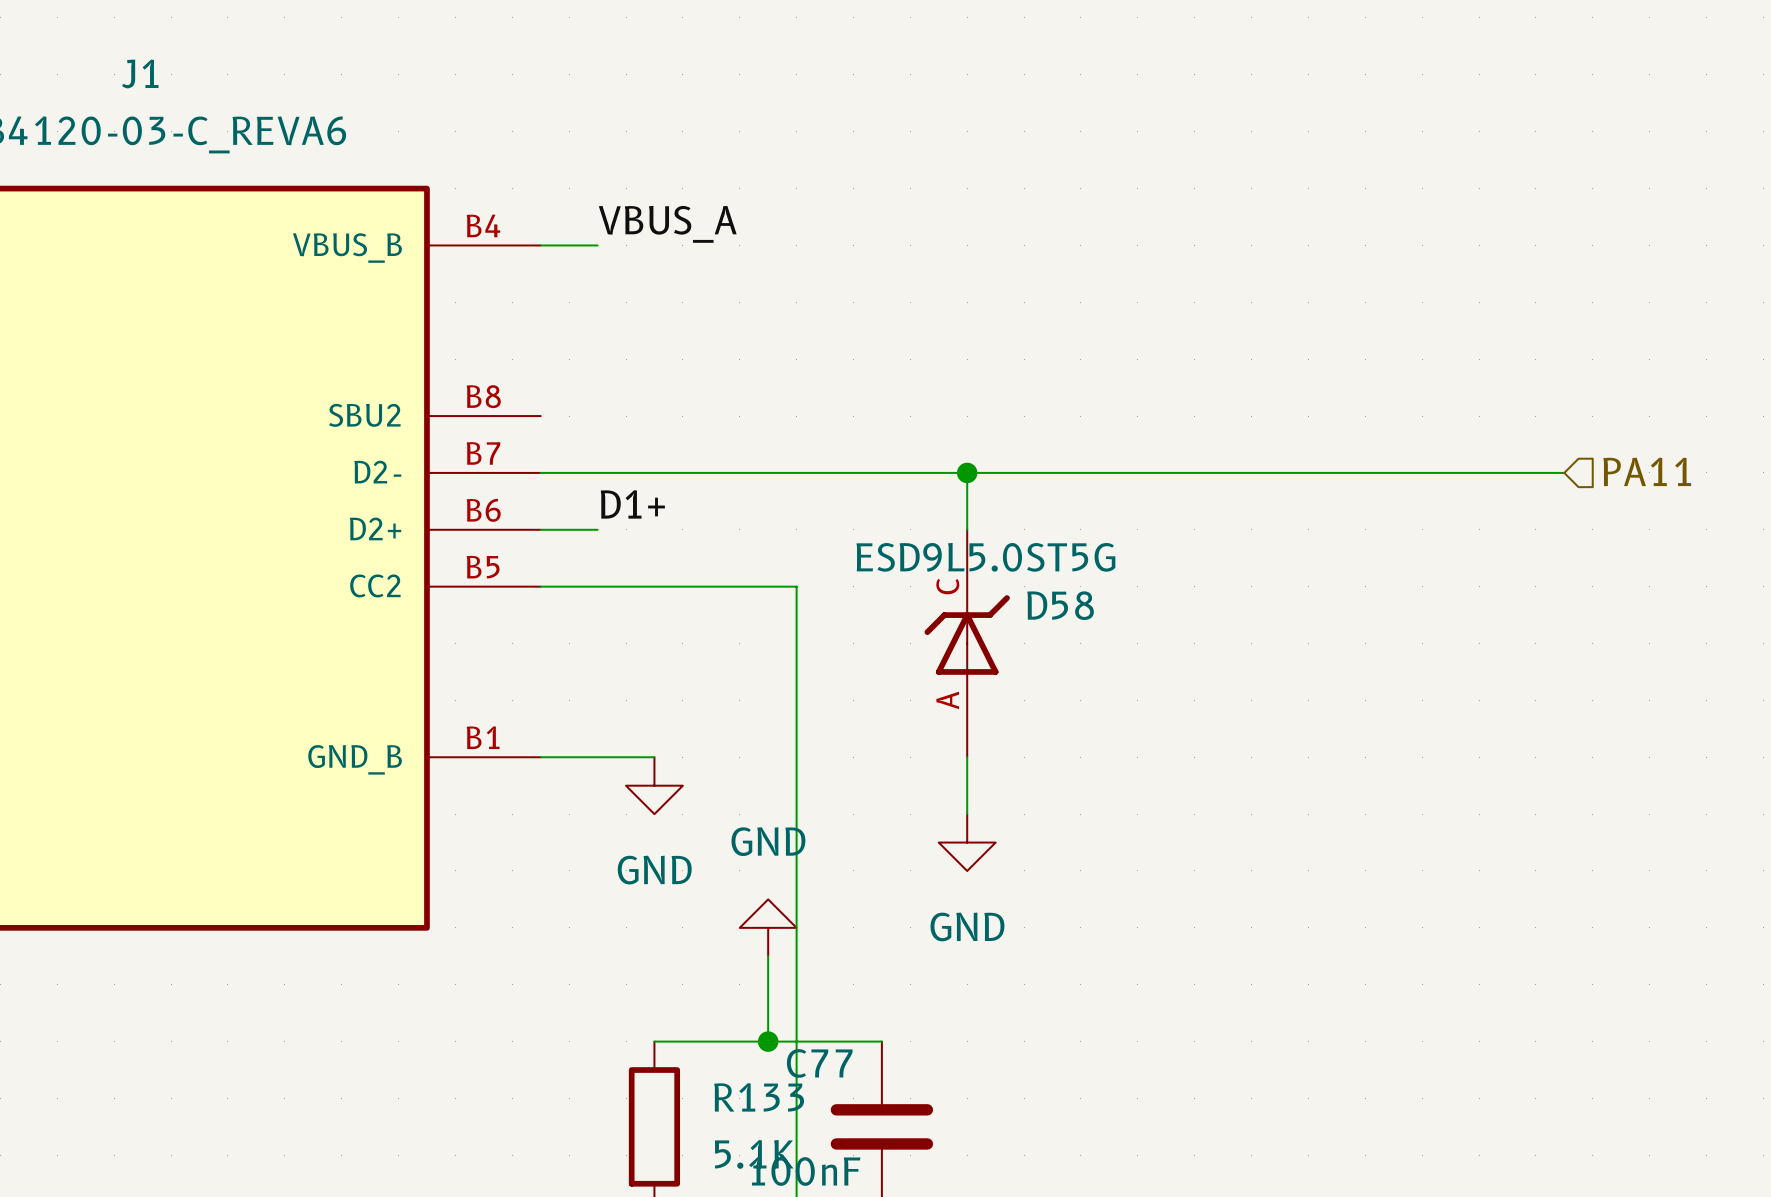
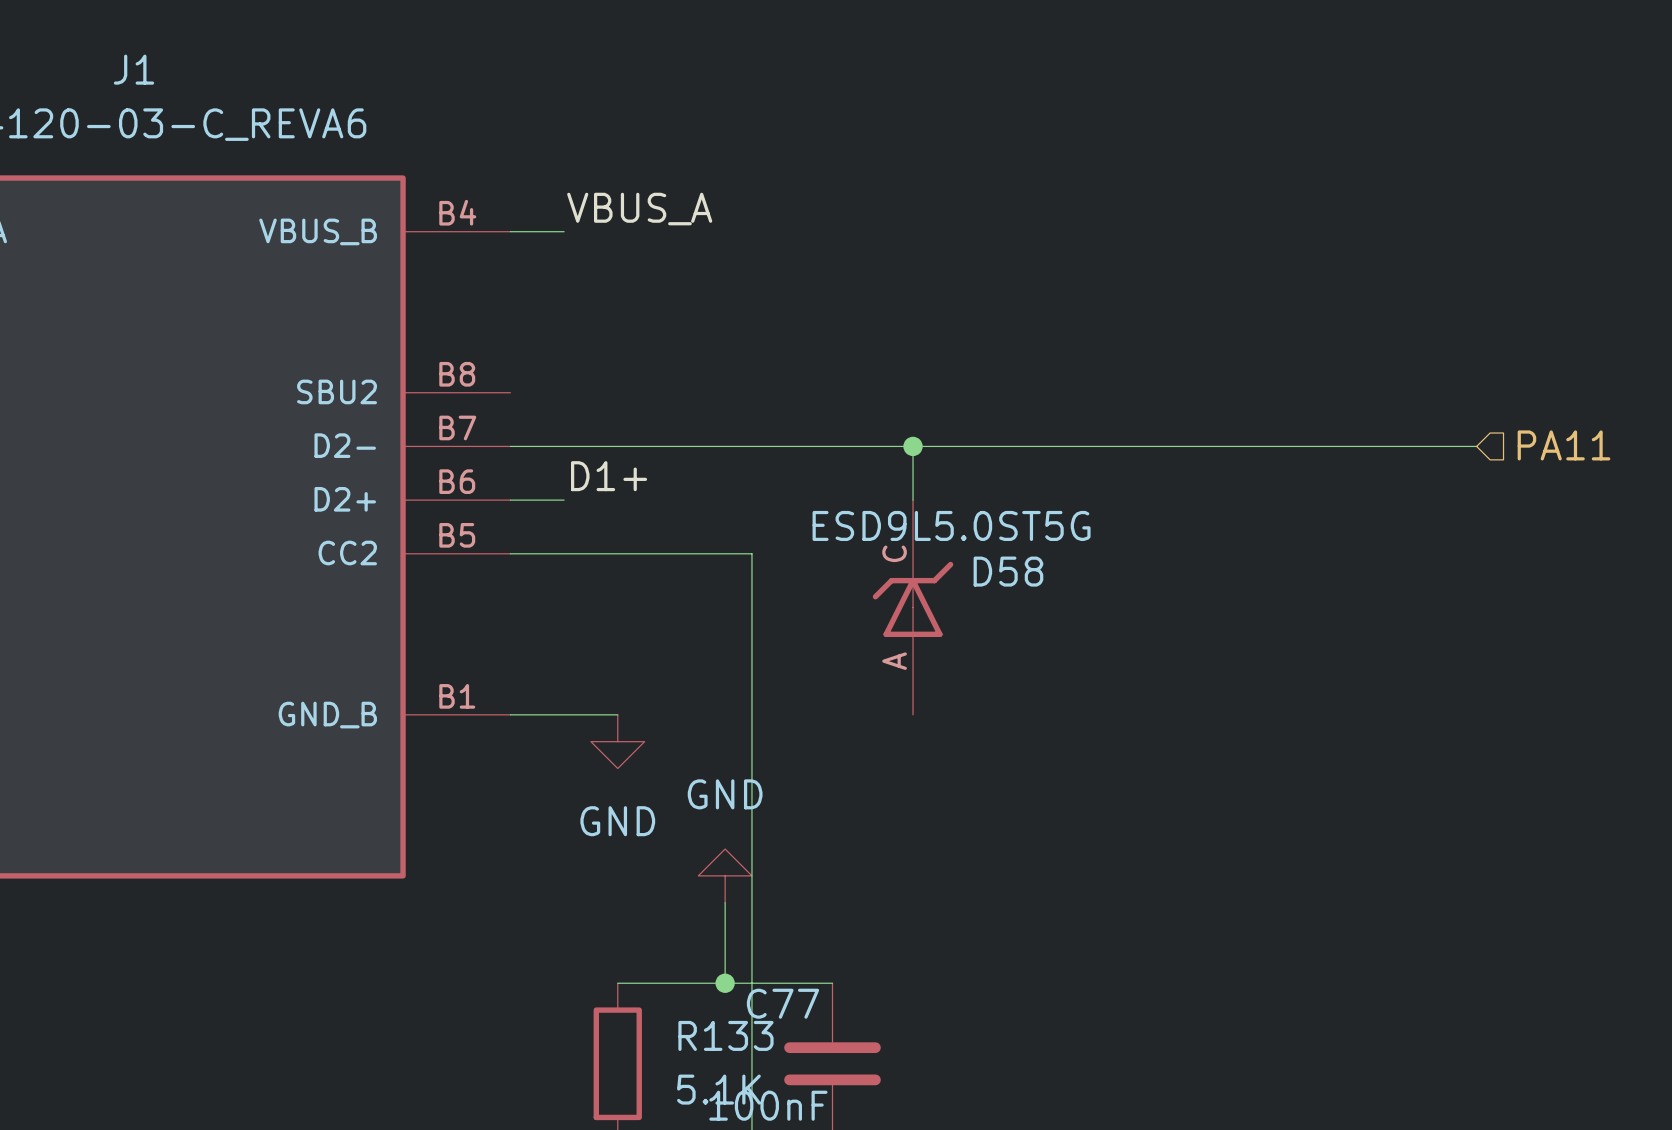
wire: (967, 757) (967, 814) -> none
power symbol: GND (967, 842) -> none

